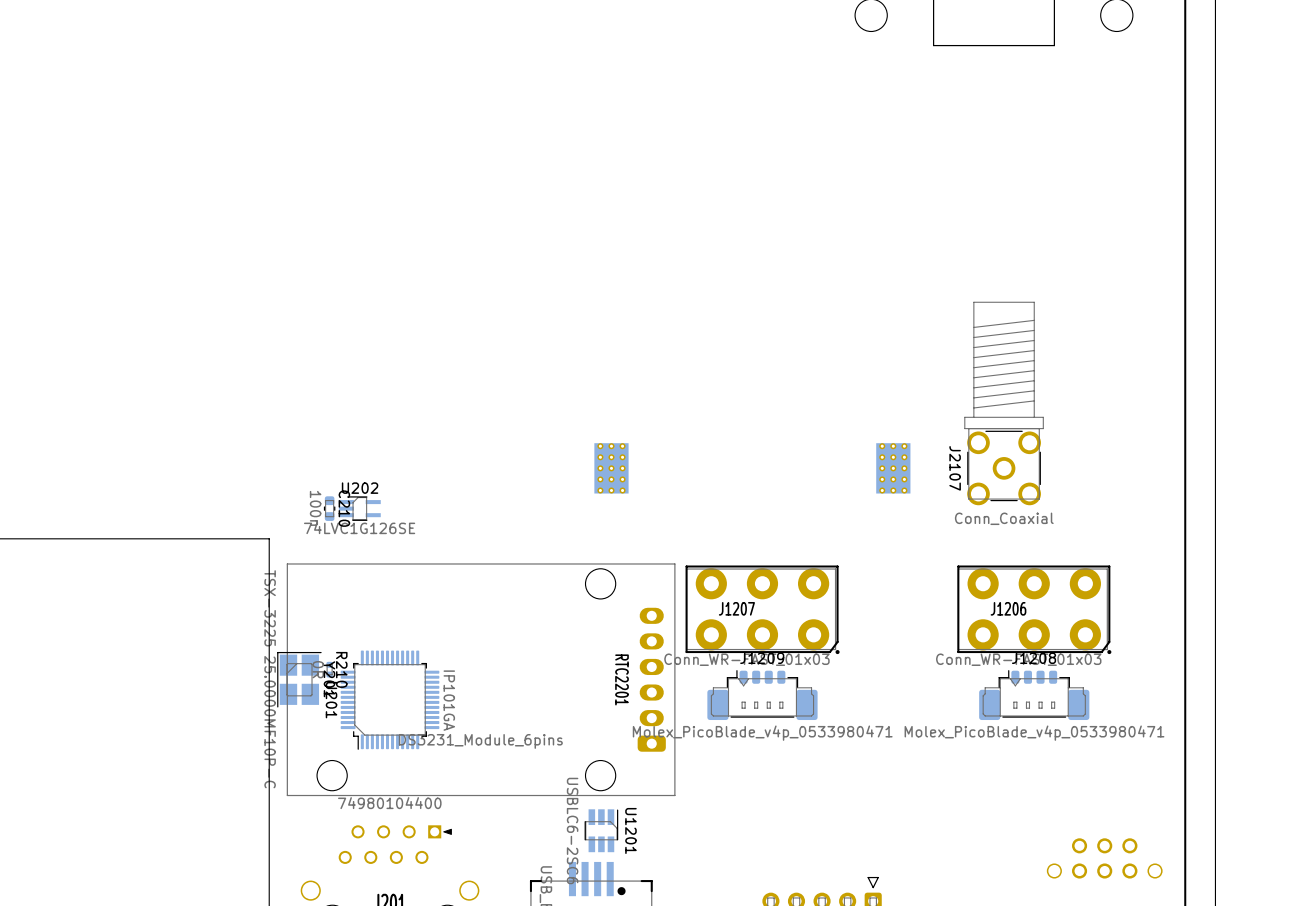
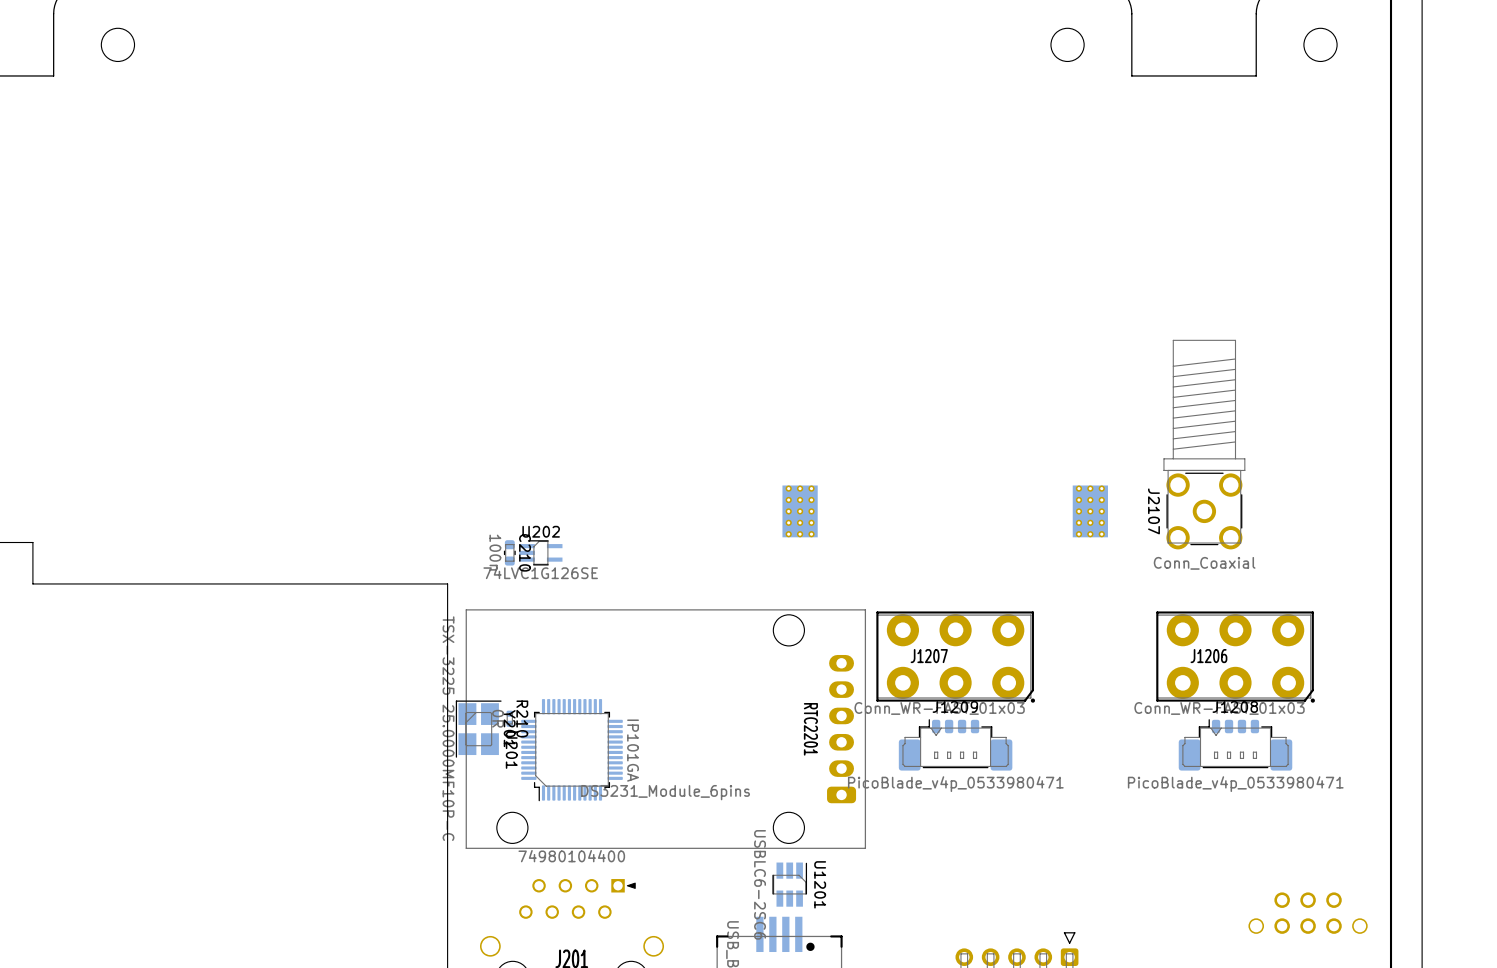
J1209 value: Molex_PicoBlade_v4p_0533980471 (762, 733) -> PicoBlade_v4p_0533980471 (955, 784)
J1208 value: Molex_PicoBlade_v4p_0533980471 (1034, 733) -> PicoBlade_v4p_0533980471 (1235, 784)

